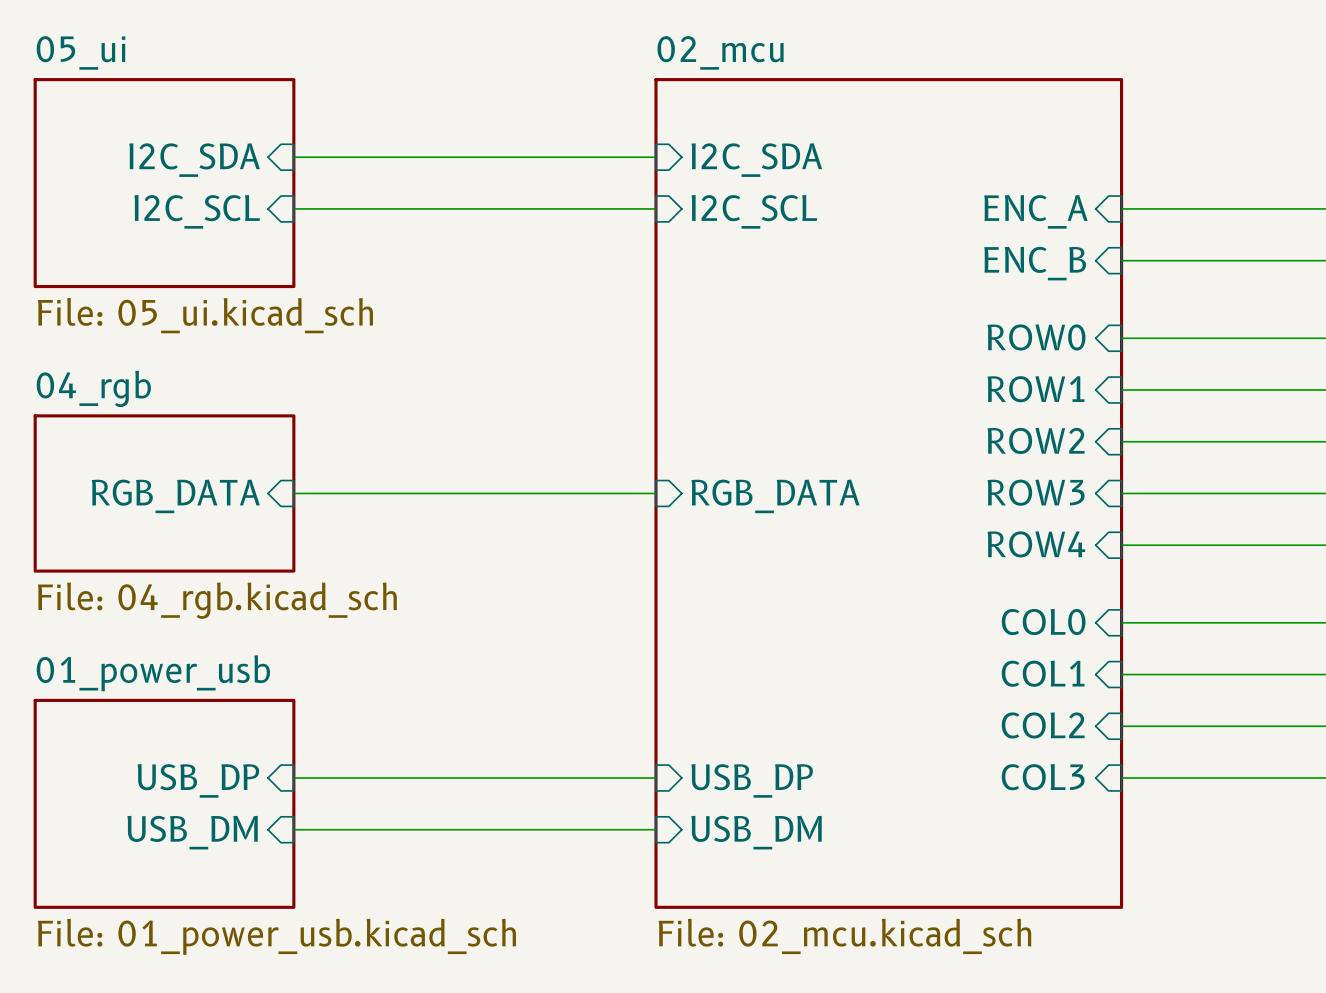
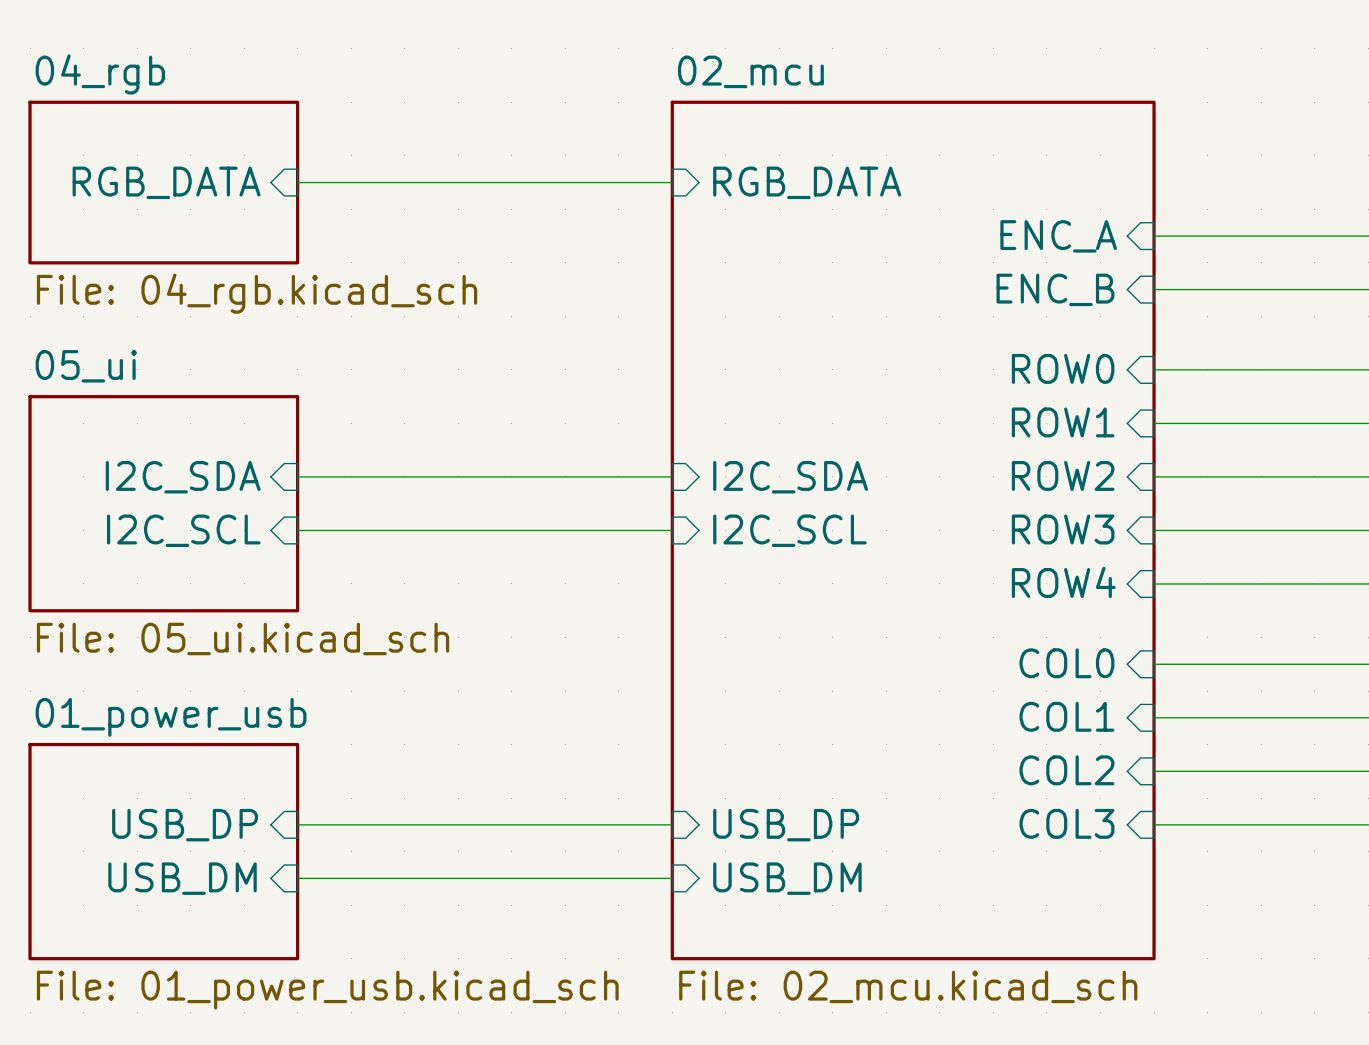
sheet pin: I2C_SDA (194, 160) -> RGB_DATA (166, 182)
sheet pin: I2C_SDA (756, 160) -> RGB_DATA (807, 182)
sheet 05_ui position: (164, 183) -> (163, 503)
wire: (293, 208) (655, 208) -> (297, 476) (672, 476)
sheet pin: I2C_SCL (197, 211) -> none
sheet pin: I2C_SCL (754, 211) -> none
sheet pin: none -> I2C_SDA (183, 477)
sheet pin: none -> I2C_SDA (790, 477)
sheet 04_rgb position: (164, 493) -> (163, 182)
sheet pin: RGB_DATA (175, 496) -> I2C_SCL (183, 530)
sheet pin: RGB_DATA (775, 496) -> I2C_SCL (789, 530)

